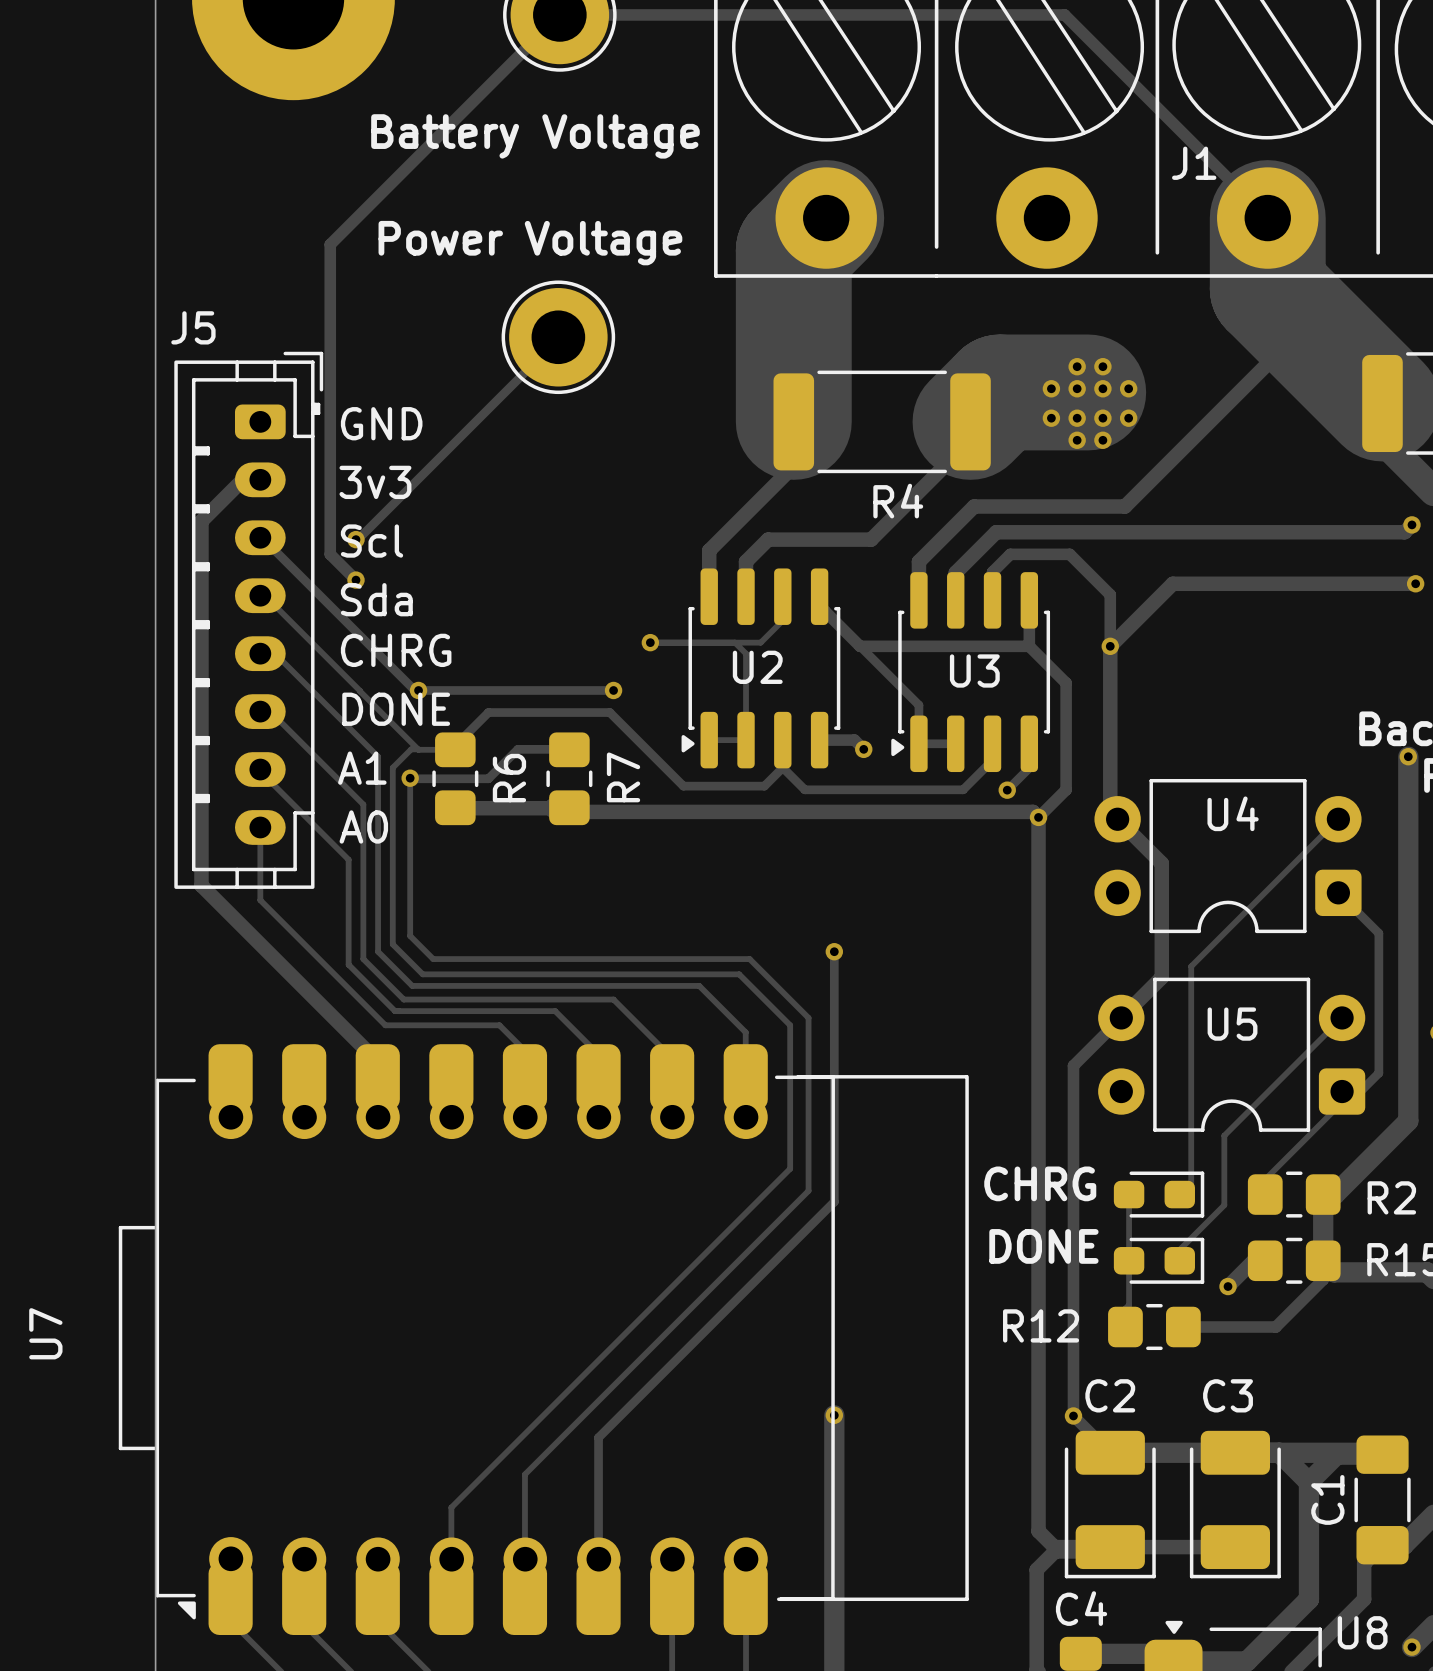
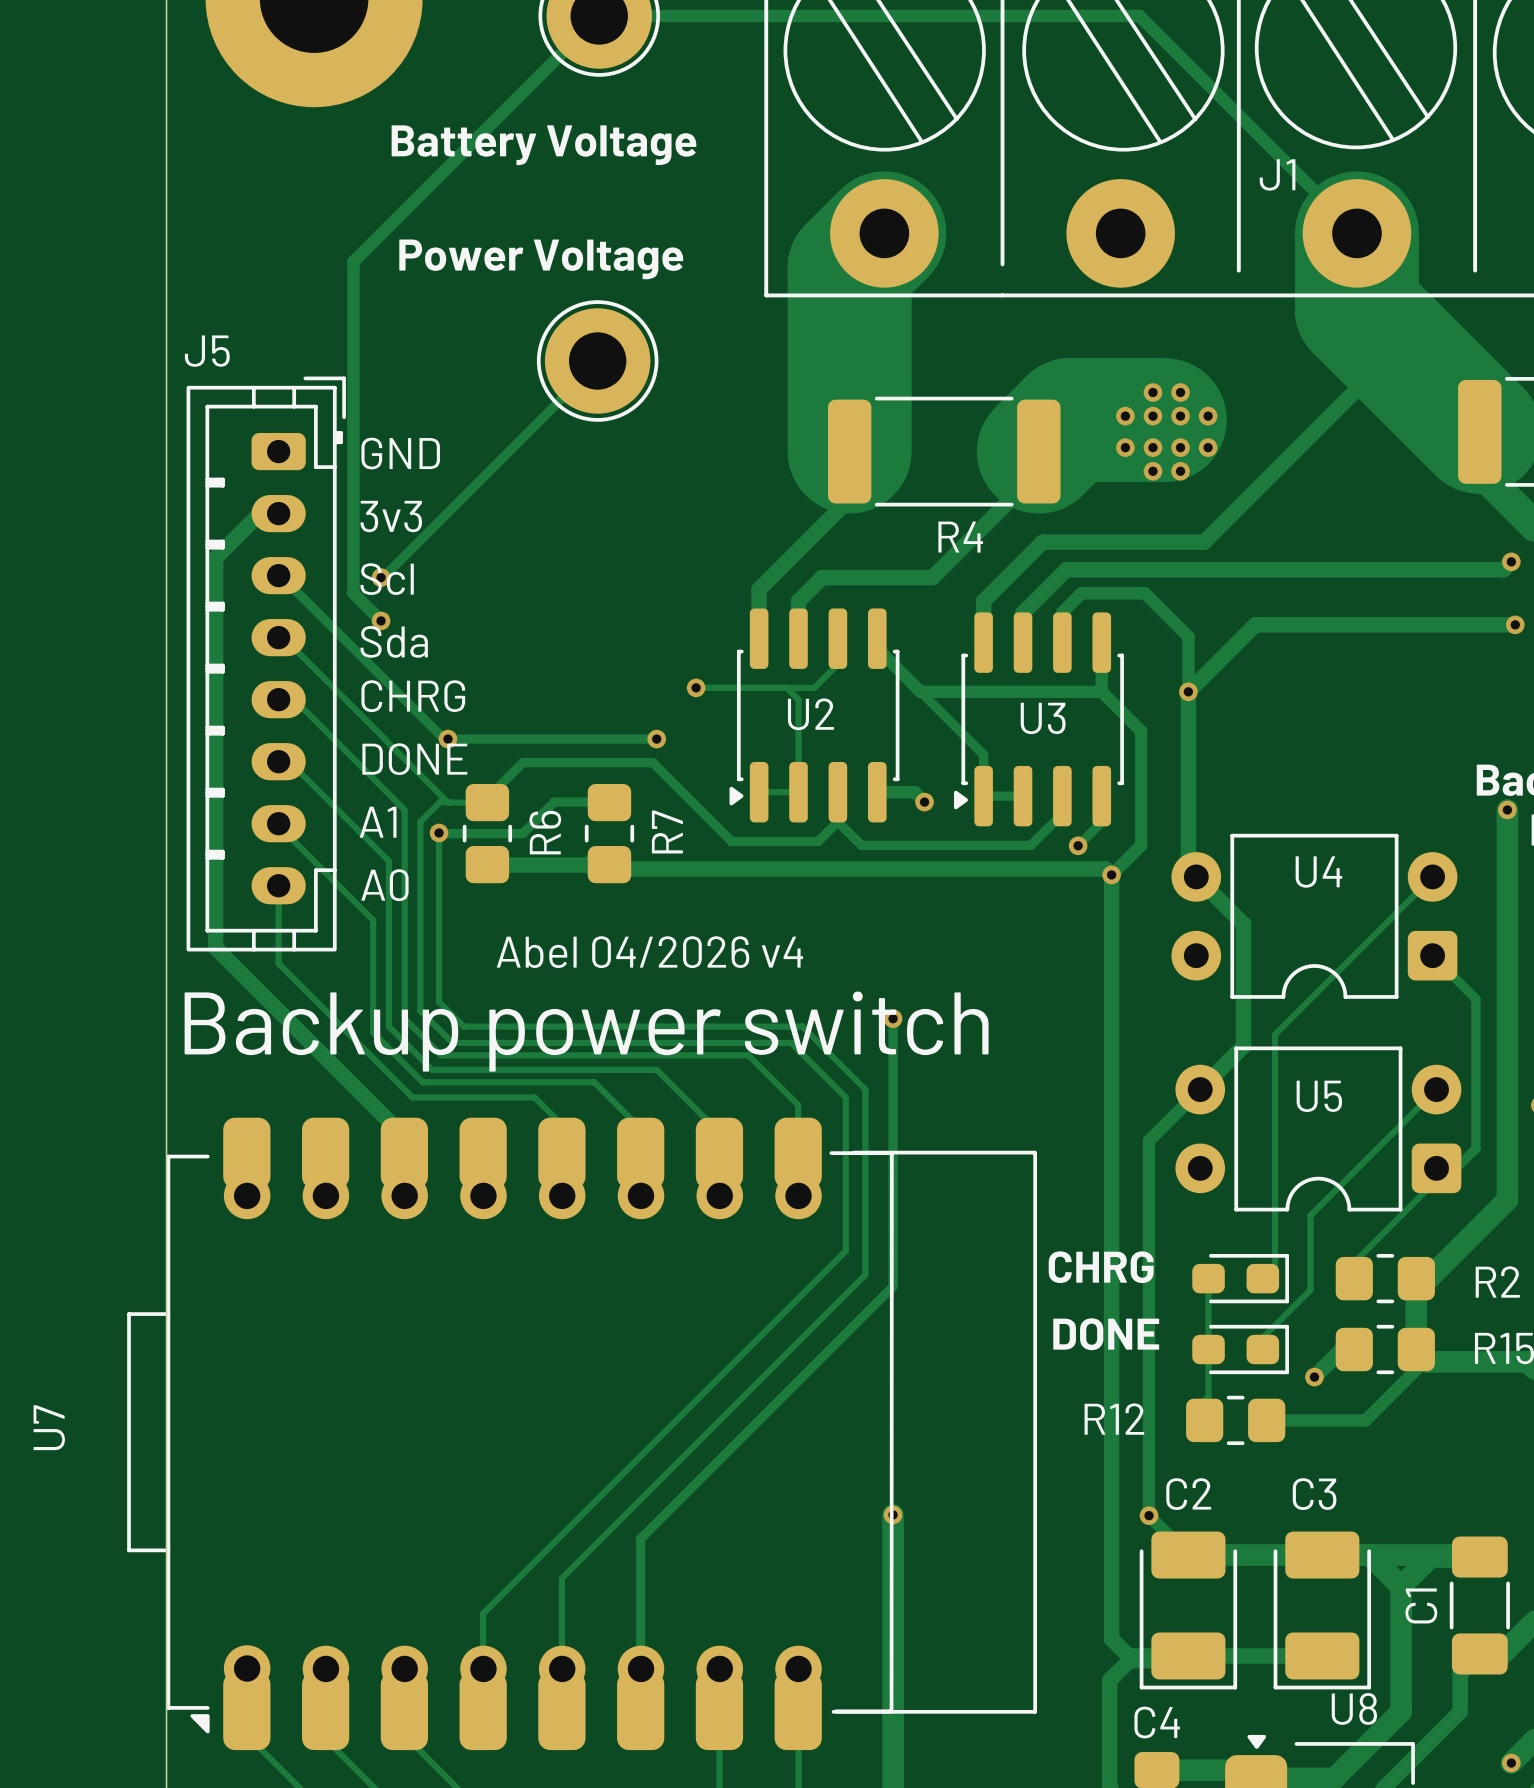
text: none -> Abel 04/2026 v4 (649, 952)
text: none -> Backup power switch (586, 1031)
U8 name position: U8 (1362, 1632) -> U8 (1354, 1708)

